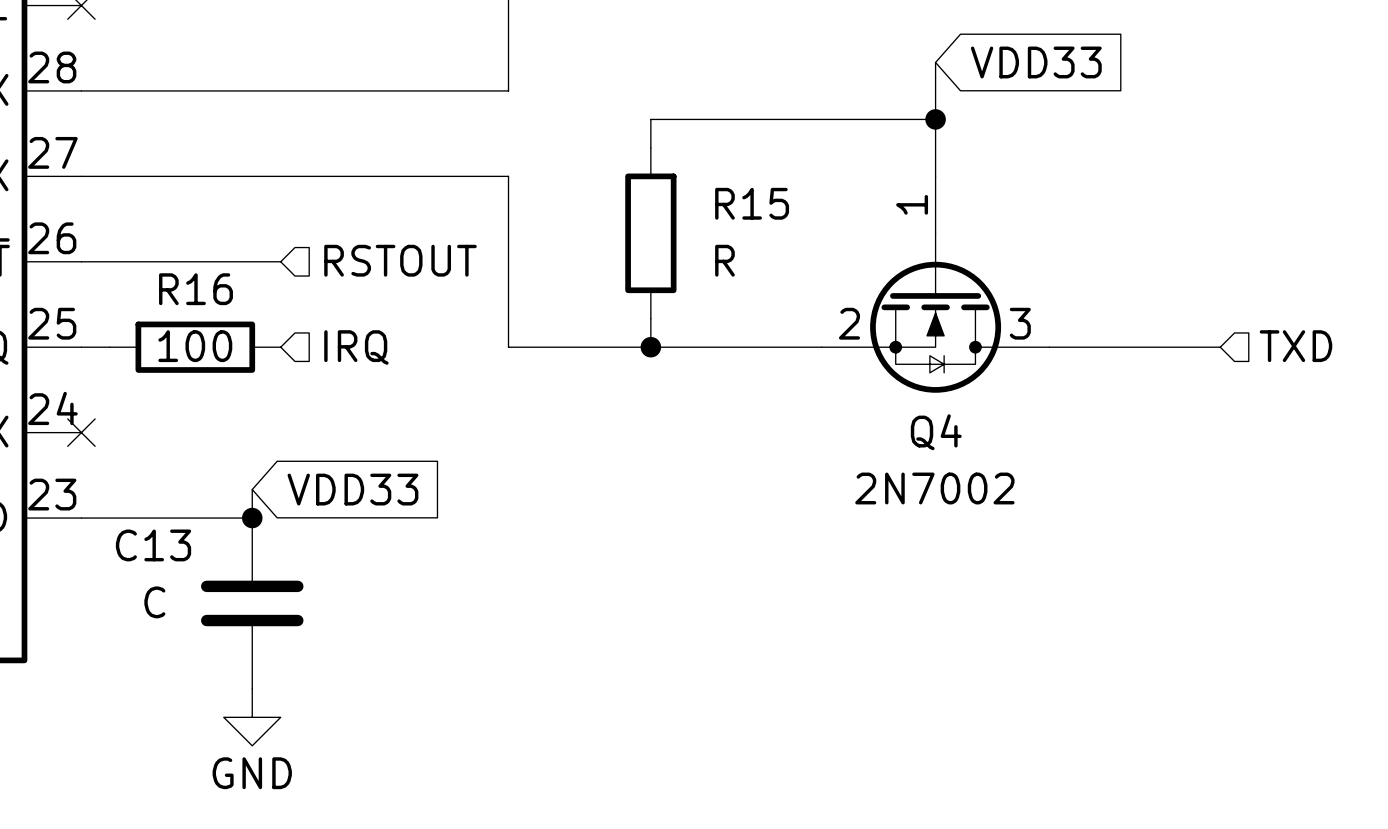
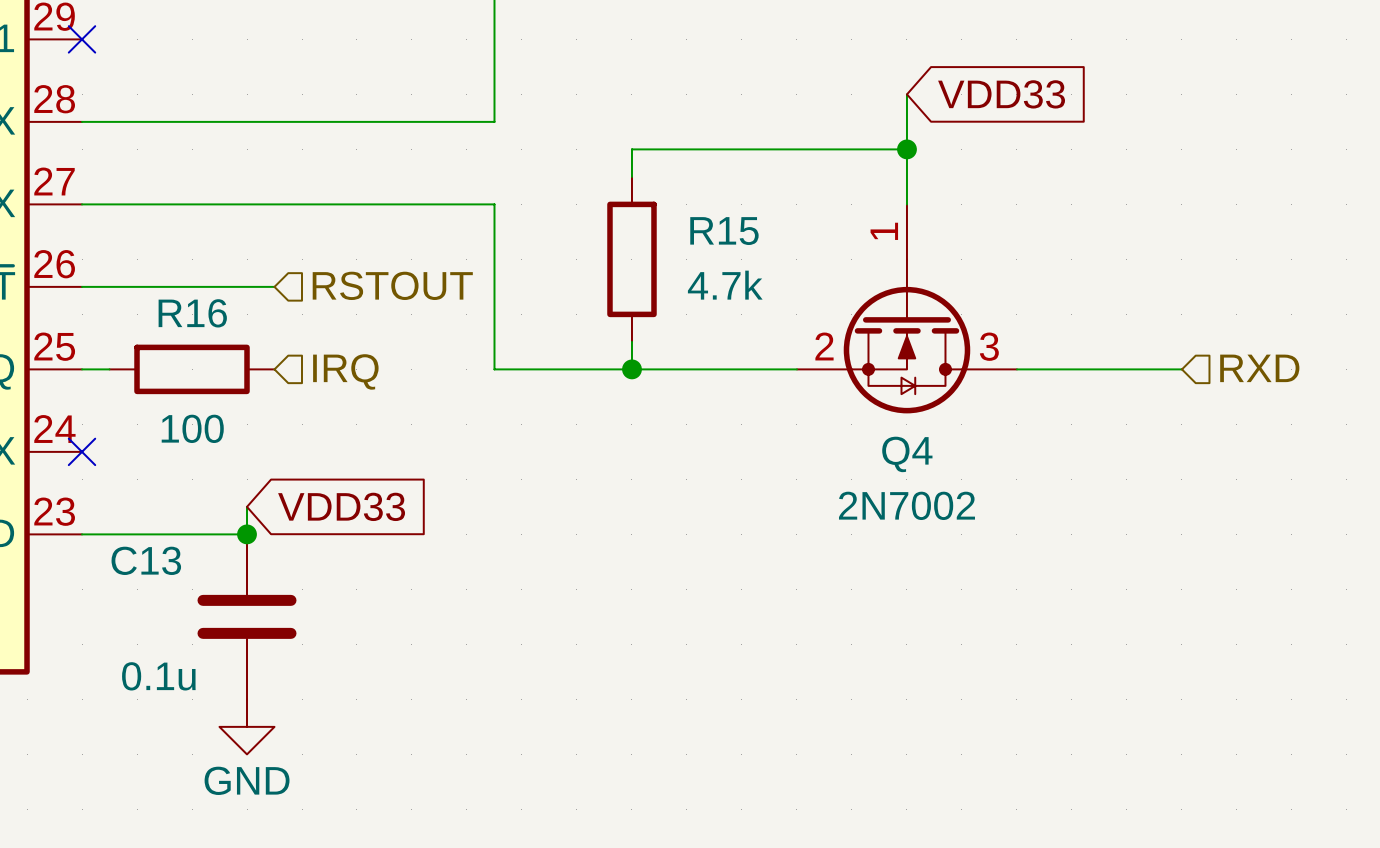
R15 value: R (724, 260) -> 4.7k (725, 285)
R16 value position: 100 (195, 346) -> 100 (192, 428)
hierarchical label: TXD (1295, 346) -> RXD (1259, 368)
C13 value: C (154, 602) -> 0.1u (158, 676)

